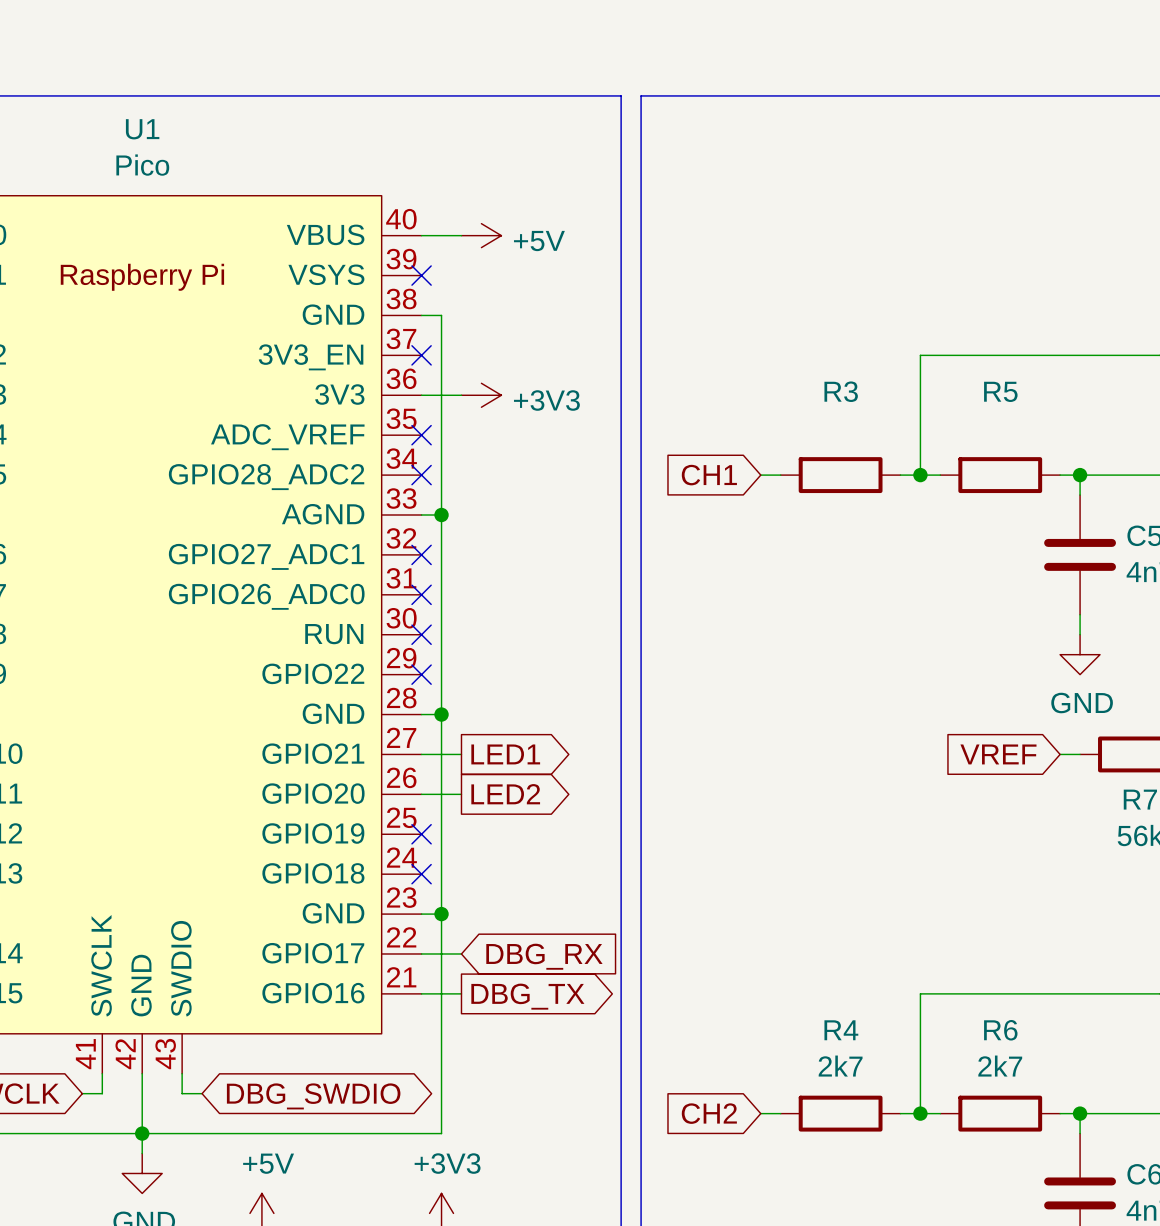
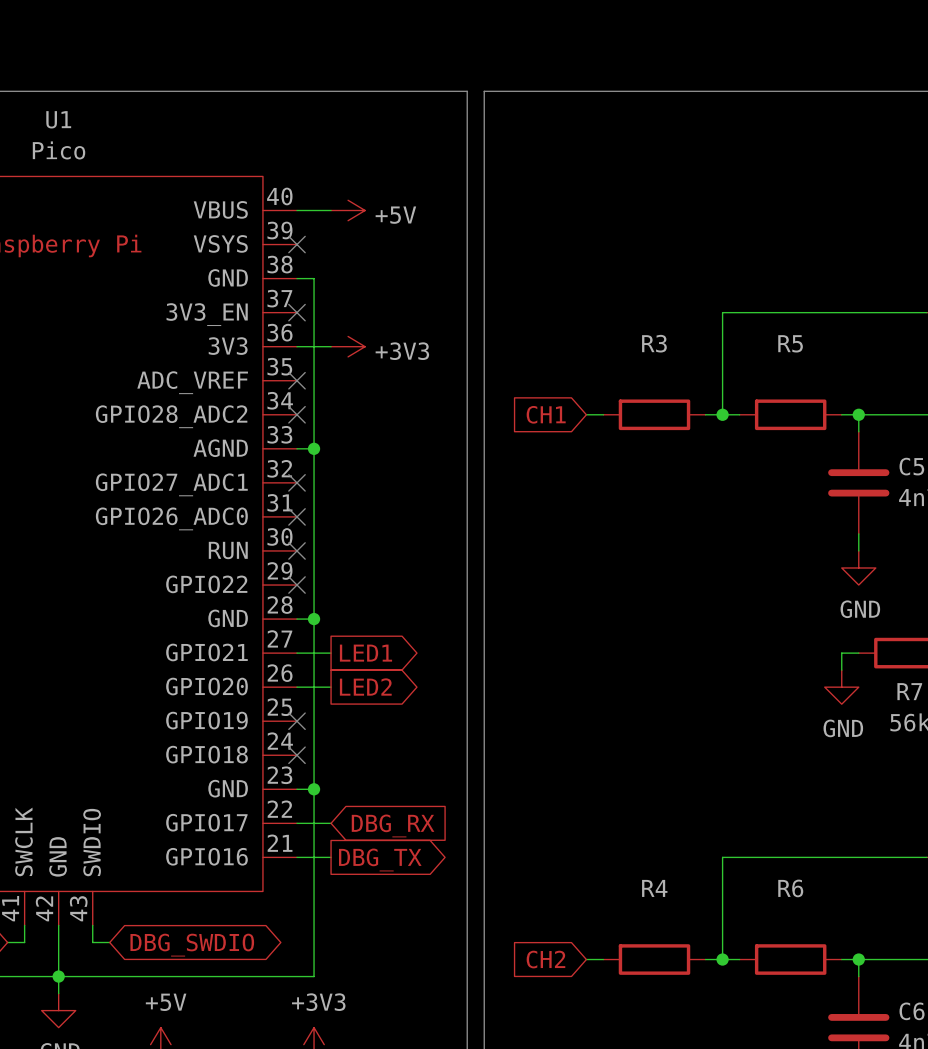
global label: VREF (998, 754) -> none
wire: none -> (841, 653) (841, 670)
power symbol: none -> GND (841, 687)
R4 value: 2k7 (840, 1066) -> none
R6 value: 2k7 (1000, 1066) -> none

